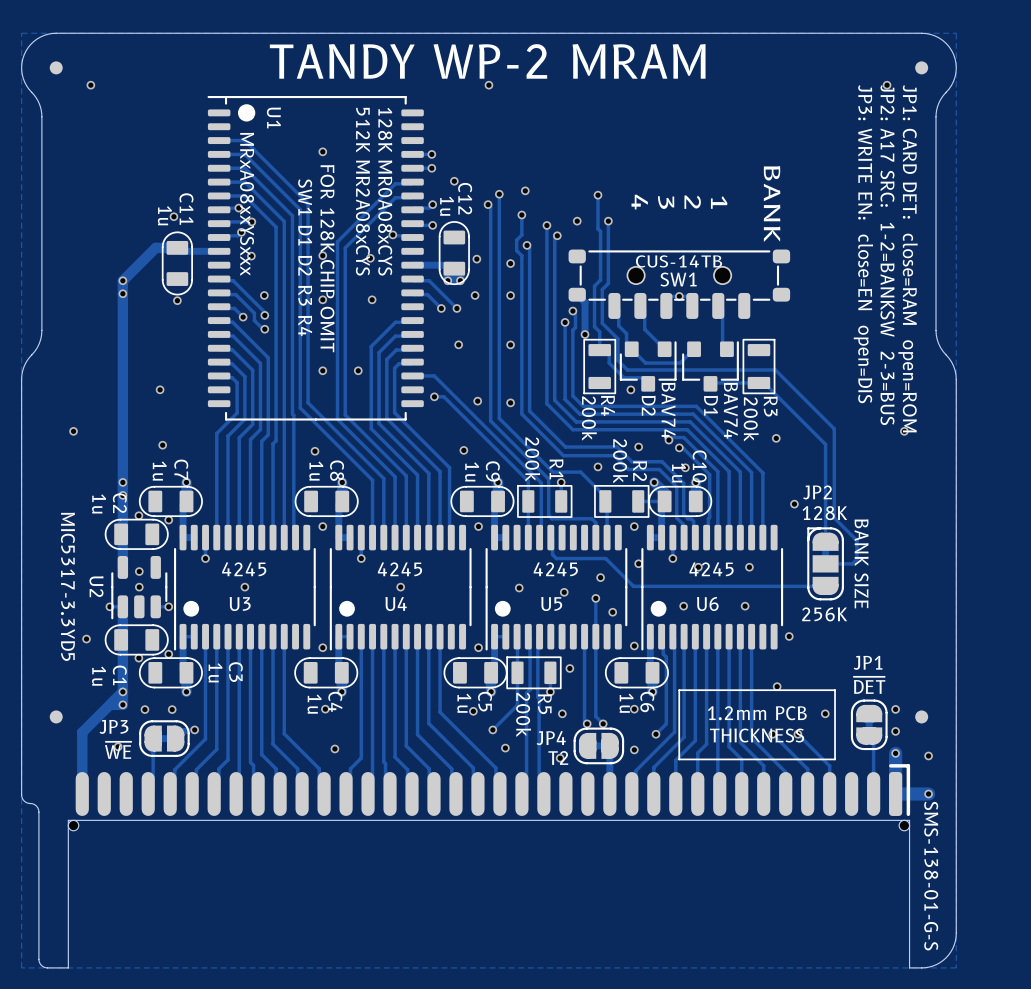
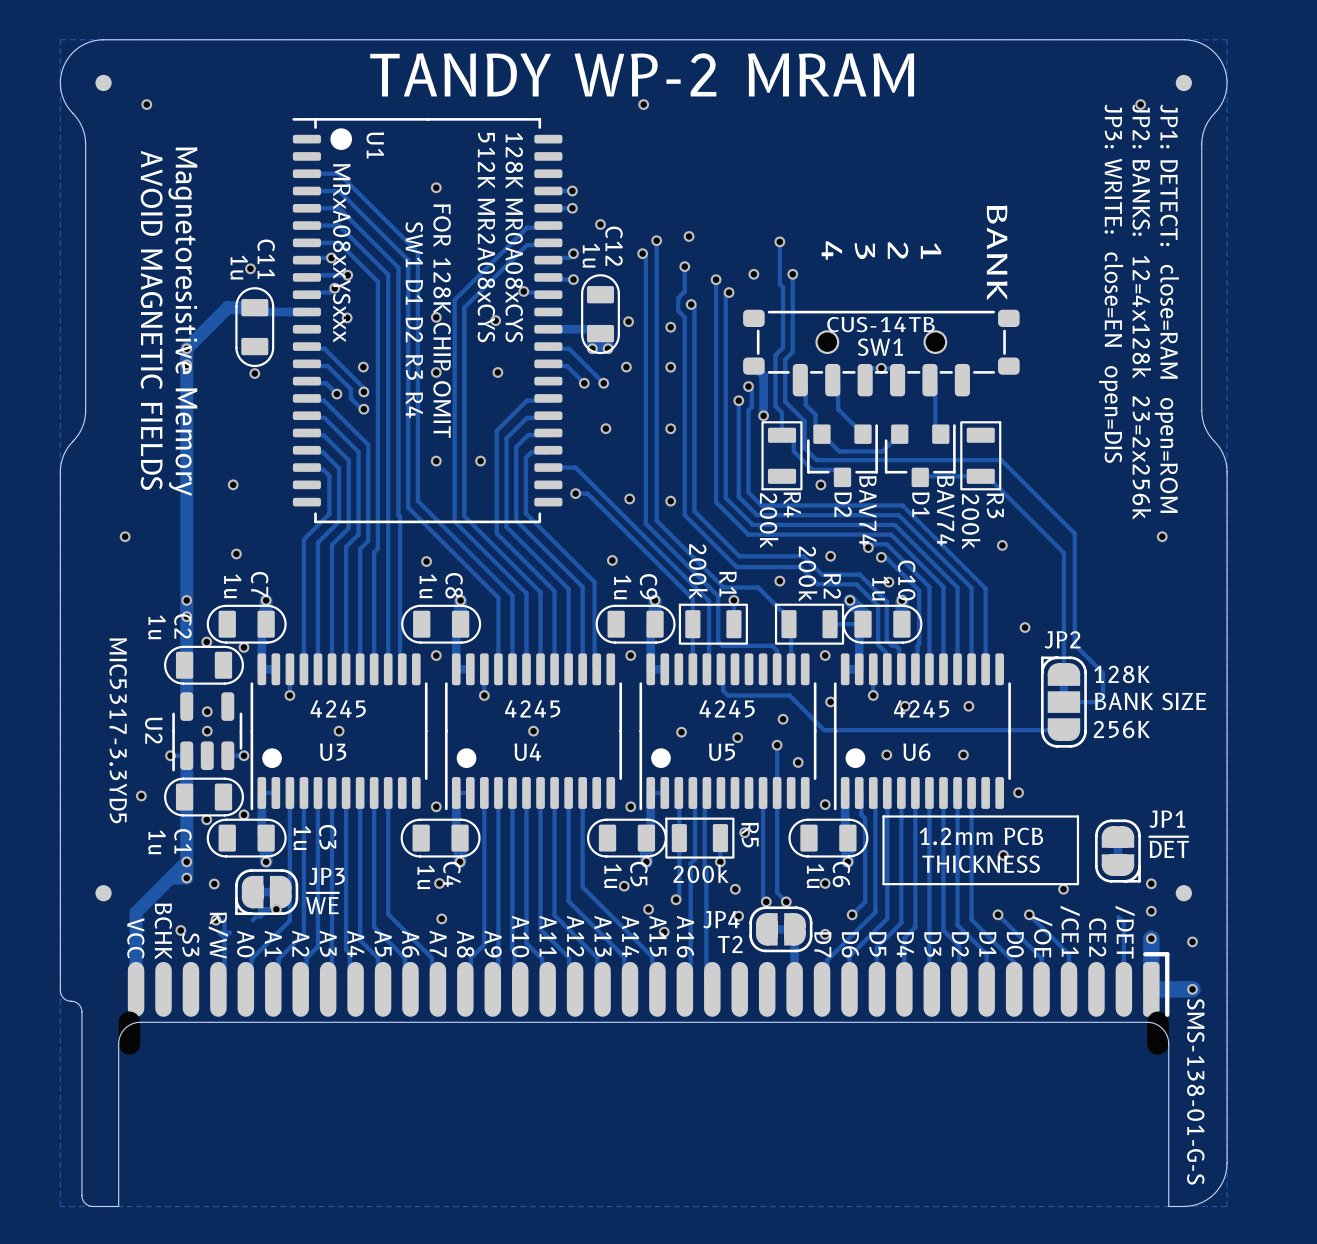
board edge: (56, 33) (921, 33) (934, 35) (946, 43) (953, 54) (956, 67) (953, 81) (940, 100) (936, 113) (936, 330) (940, 347) (953, 366) (956, 379) (956, 933) (954, 944) (946, 957) (929, 967) (909, 967) (909, 820) (68, 820) (68, 967) (46, 967) (41, 965) (38, 959) (38, 811) (35, 805) (24, 800) (21, 794) (21, 379) (24, 366) (37, 347) (41, 334) (41, 116) (37, 100) (24, 82) (21, 66) (26, 50) (33, 41) (44, 35) (56, 33) -> none
text: JP3: WRITE EN: close=EN open=DIS (863, 244) -> JP3: WRITE: close=EN open=DIS (1111, 283)
text: JP2: A17 SRC: 1-2=BANKSW 2-3=BUS (887, 255) -> JP2: BANKS: 12=4x128k 23=2x256k (1141, 312)
text: none -> AVOID MAGNETIC FIELDS (151, 320)
text: none -> Magnetoresistive Memory (182, 321)
text: JP1: CARD DET: close=RAM open=ROM (908, 258) -> JP1: DETECT: close=RAM open=ROM (1166, 308)
JP2 name position: JP2 (817, 492) -> JP2 (1062, 639)
part: none -> (643, 623)
JP2 text position: 128K (824, 513) -> 128K (1122, 674)
JP2 value rotation: 0° (861, 563) -> 90° counterclockwise (1150, 701)
JP2 text position: 256K (824, 614) -> 256K (1121, 729)
line: none -> (883, 816) (1077, 816) (1077, 884) (883, 884) (883, 816)
JP1 name position: JP1 (868, 662) -> JP1 (1167, 819)
JP1 value position: ~{DET} (869, 685) -> ~{DET} (1169, 847)
line: (679, 690) (835, 690) (835, 759) (679, 759) (679, 690) -> none
JP1 footprint: [850, 699, 888, 751] -> [1095, 819, 1141, 883]
R5 name position: R5 (544, 704) -> R5 (750, 835)
track: (517, 705) (492, 729) -> (679, 878) (679, 896) (676, 899)
via position: (172, 709) -> (215, 920)
text position: 1.2mm PCB (757, 713) -> 1.2mm PCB (981, 836)
R5 value rotation: 0° (523, 714) -> 90° counterclockwise (701, 873)
JP3 footprint: [139, 720, 190, 757] -> [235, 869, 299, 916]
via: none -> (676, 899)
JP3 name position: JP3 (113, 726) -> JP3 (326, 876)
text position: THICKNESS (757, 735) -> THICKNESS (981, 864)
text: none -> BCHK (163, 931)
text: none -> /CE1 (1070, 931)
via position: (334, 748) -> (441, 918)
text: none -> /DET (1125, 932)
JP3 value position: ~{WE} (118, 750) -> ~{WE} (322, 903)
text: none -> R/W (218, 935)
text: none -> A10 (520, 936)
text: none -> A11 (548, 936)
text: none -> A12 (575, 936)
text: none -> A13 (603, 936)
text: none -> A14 (630, 936)
text: none -> A15 (658, 936)
text: none -> A16 (685, 936)
text: none -> /OE (1042, 936)
text: none -> CE2 (1097, 937)
text: none -> VCC (135, 938)
text: none -> A0 (245, 944)
text: none -> A1 (273, 943)
text: none -> A2 (300, 943)
text: none -> A3 (328, 943)
text: none -> A4 (355, 943)
text: none -> A5 (383, 943)
text: none -> A6 (410, 944)
text: none -> A7 (438, 943)
text: none -> A8 (465, 944)
text: none -> A9 (493, 944)
text: none -> D5 (877, 944)
text: none -> D3 (932, 944)
text: none -> D2 (960, 944)
text: none -> D1 (987, 944)
text: none -> S3 (190, 944)
via position: (560, 758) -> (738, 916)
text: none -> D7 (822, 944)
text: none -> D6 (850, 944)
text: none -> D4 (905, 944)
text: none -> D0 (1015, 944)
part: (73, 825) -> none
part: (904, 825) -> none

